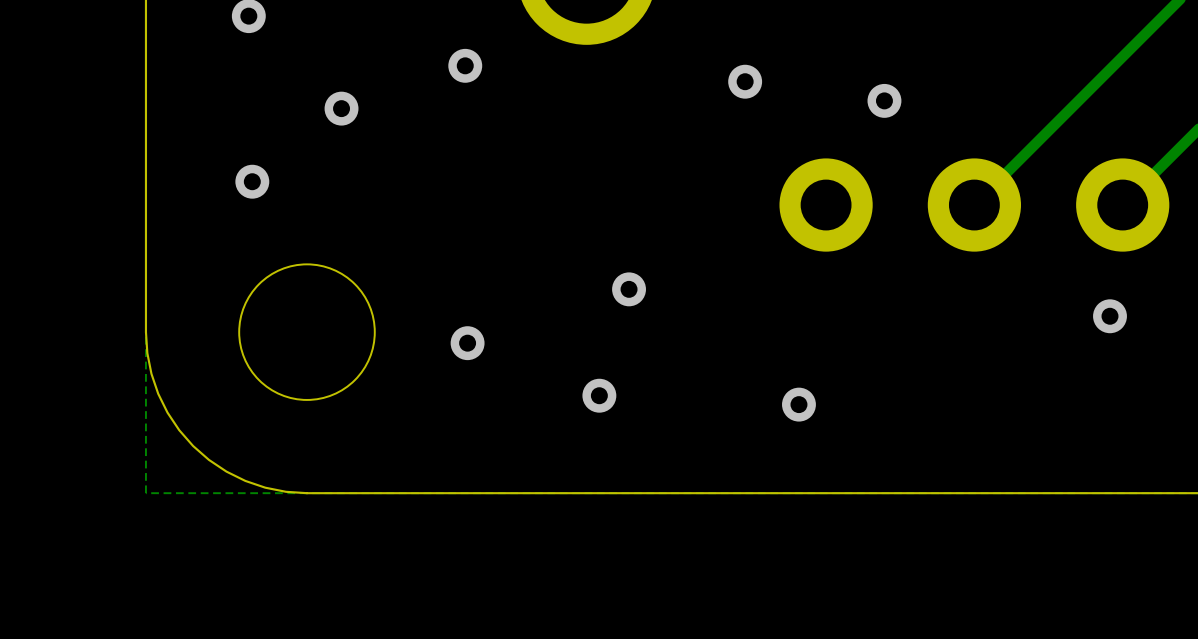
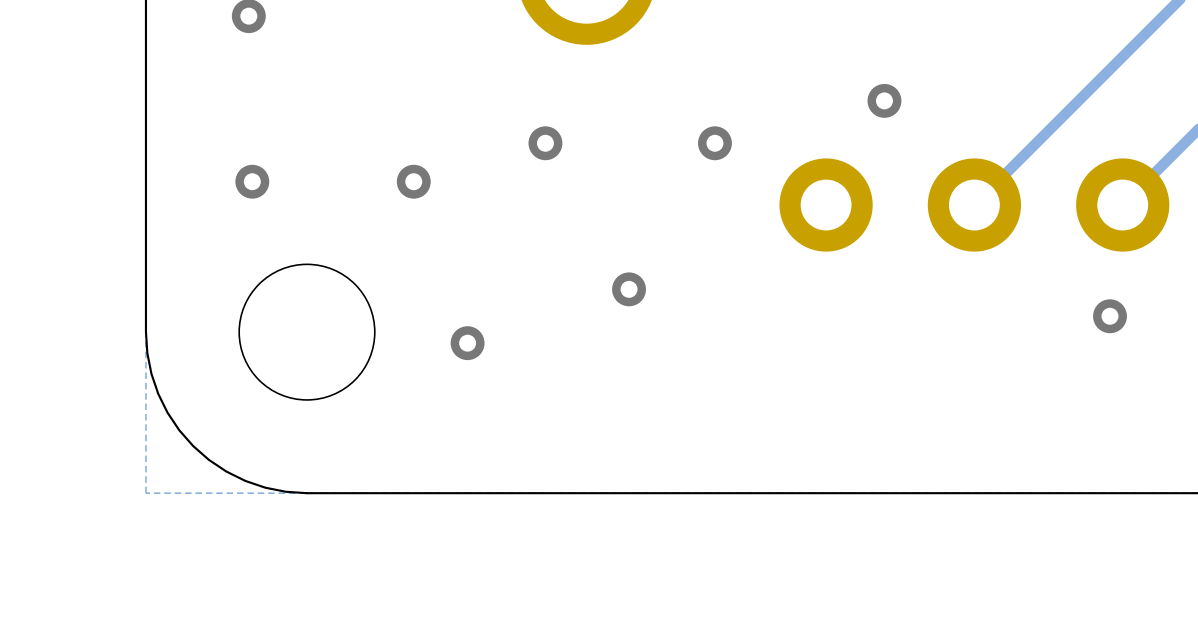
via: (465, 65) -> none
via position: (745, 81) -> (714, 143)
via: (341, 108) -> none
via: none -> (545, 143)
via: none -> (413, 181)
via: (599, 395) -> none
via: (798, 404) -> none

